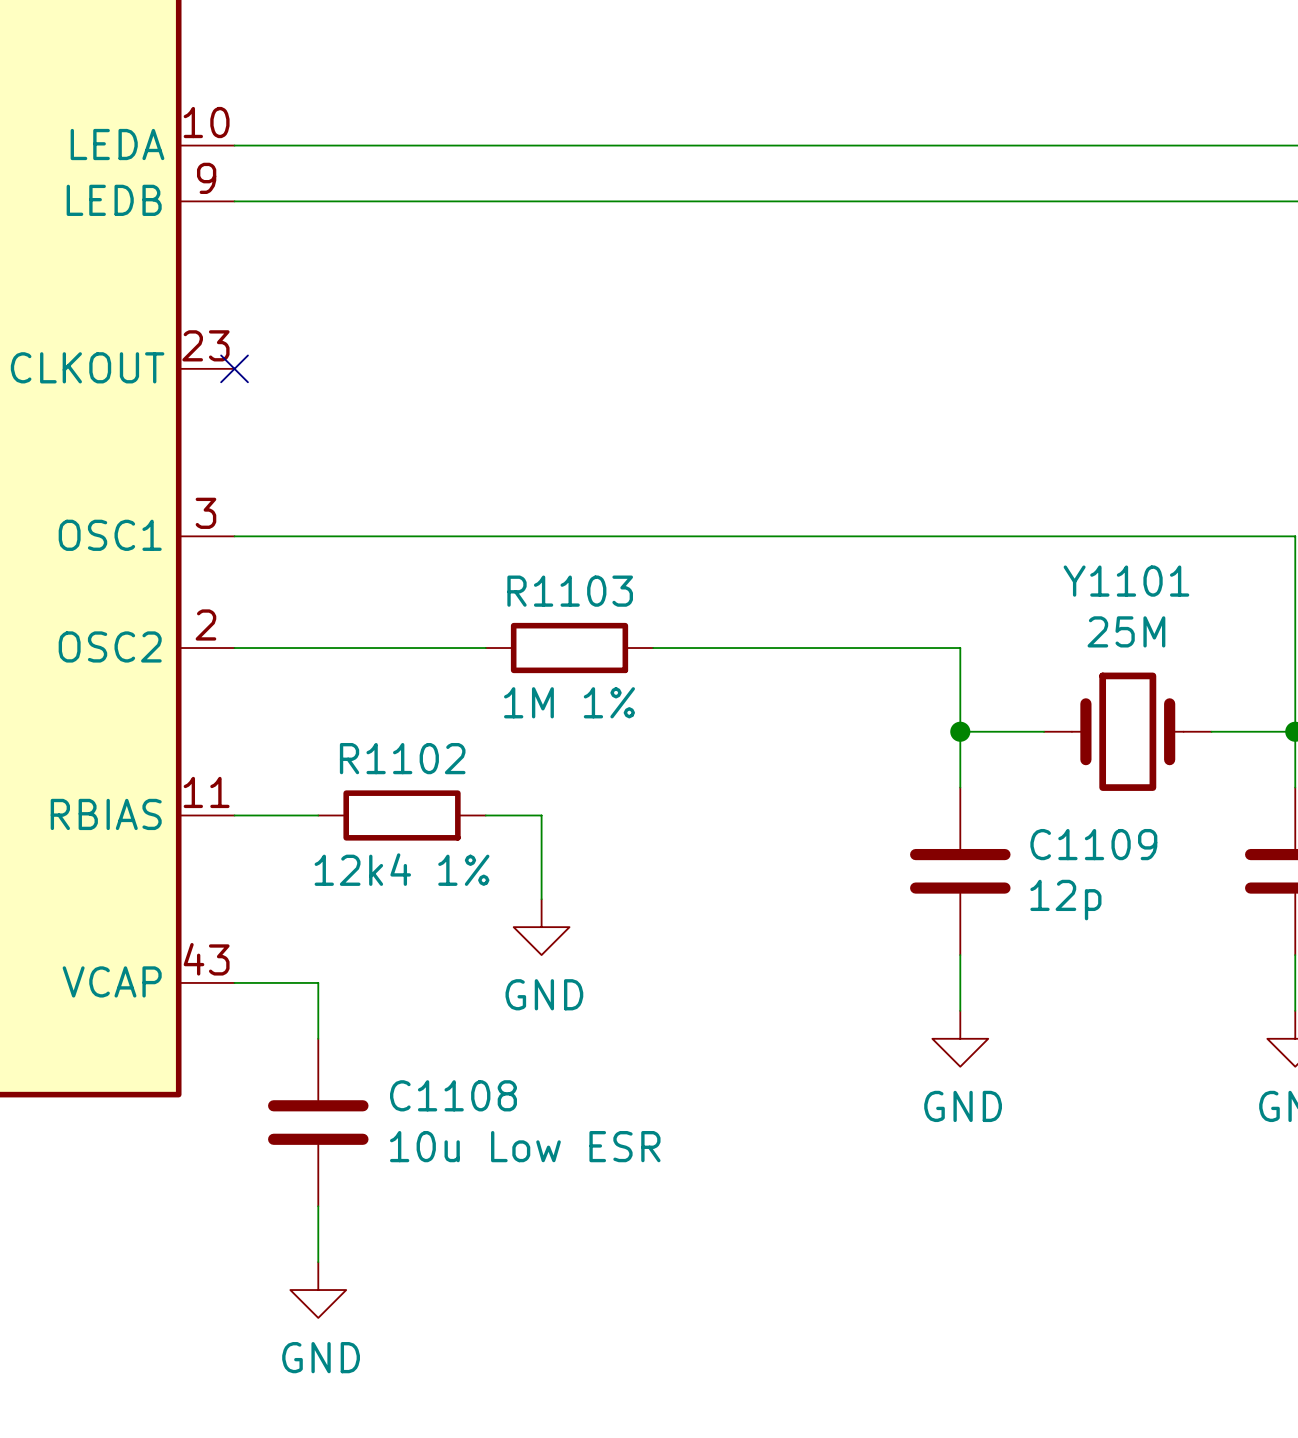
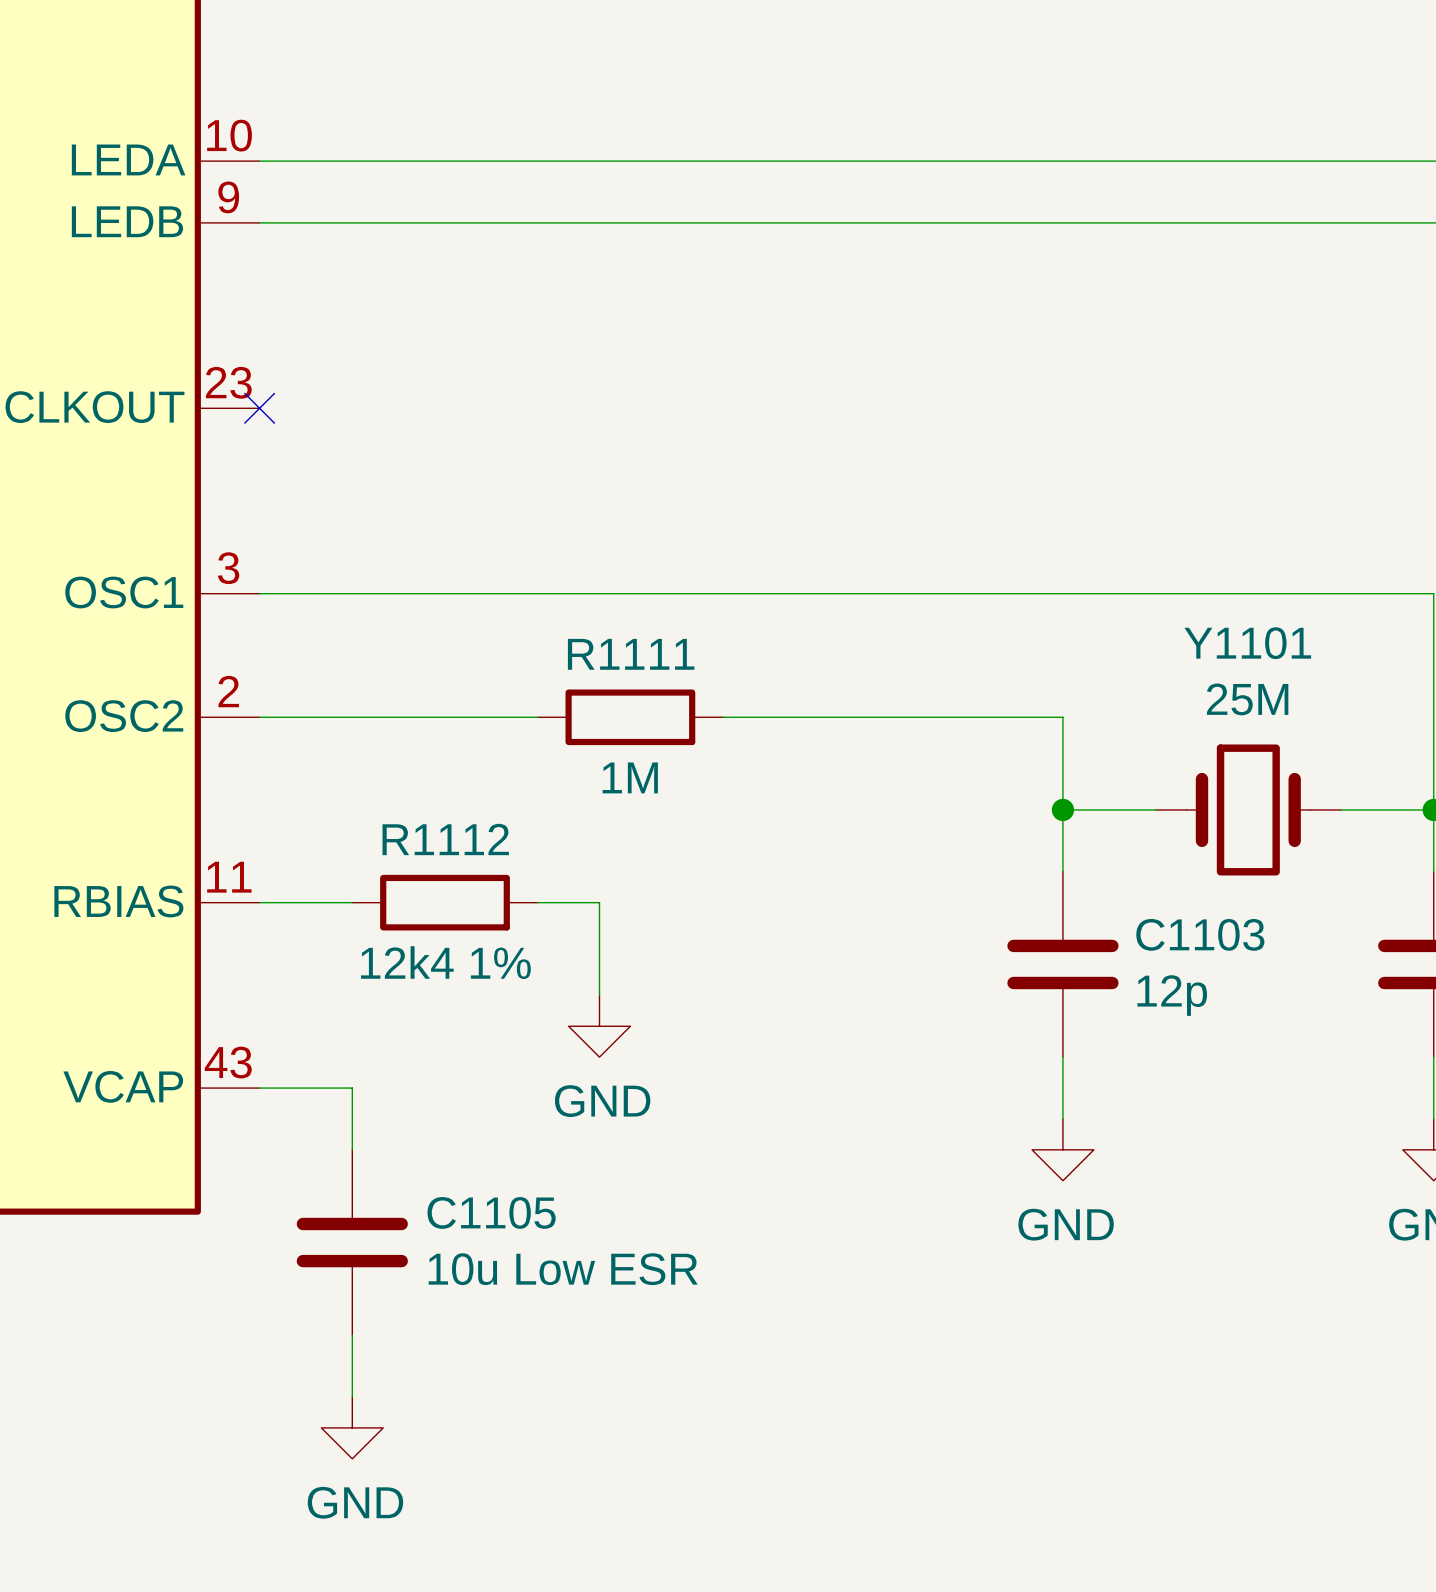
R1103 name: R1103 (570, 591) -> R1111 (631, 654)
R1103 value: 1M 1% (569, 702) -> 1M (630, 777)
R1102 name: R1102 (402, 758) -> R1112 (445, 839)
C1109 name: C1109 (1093, 844) -> C1103 (1200, 934)
C1108 name: C1108 (453, 1095) -> C1105 (491, 1212)

